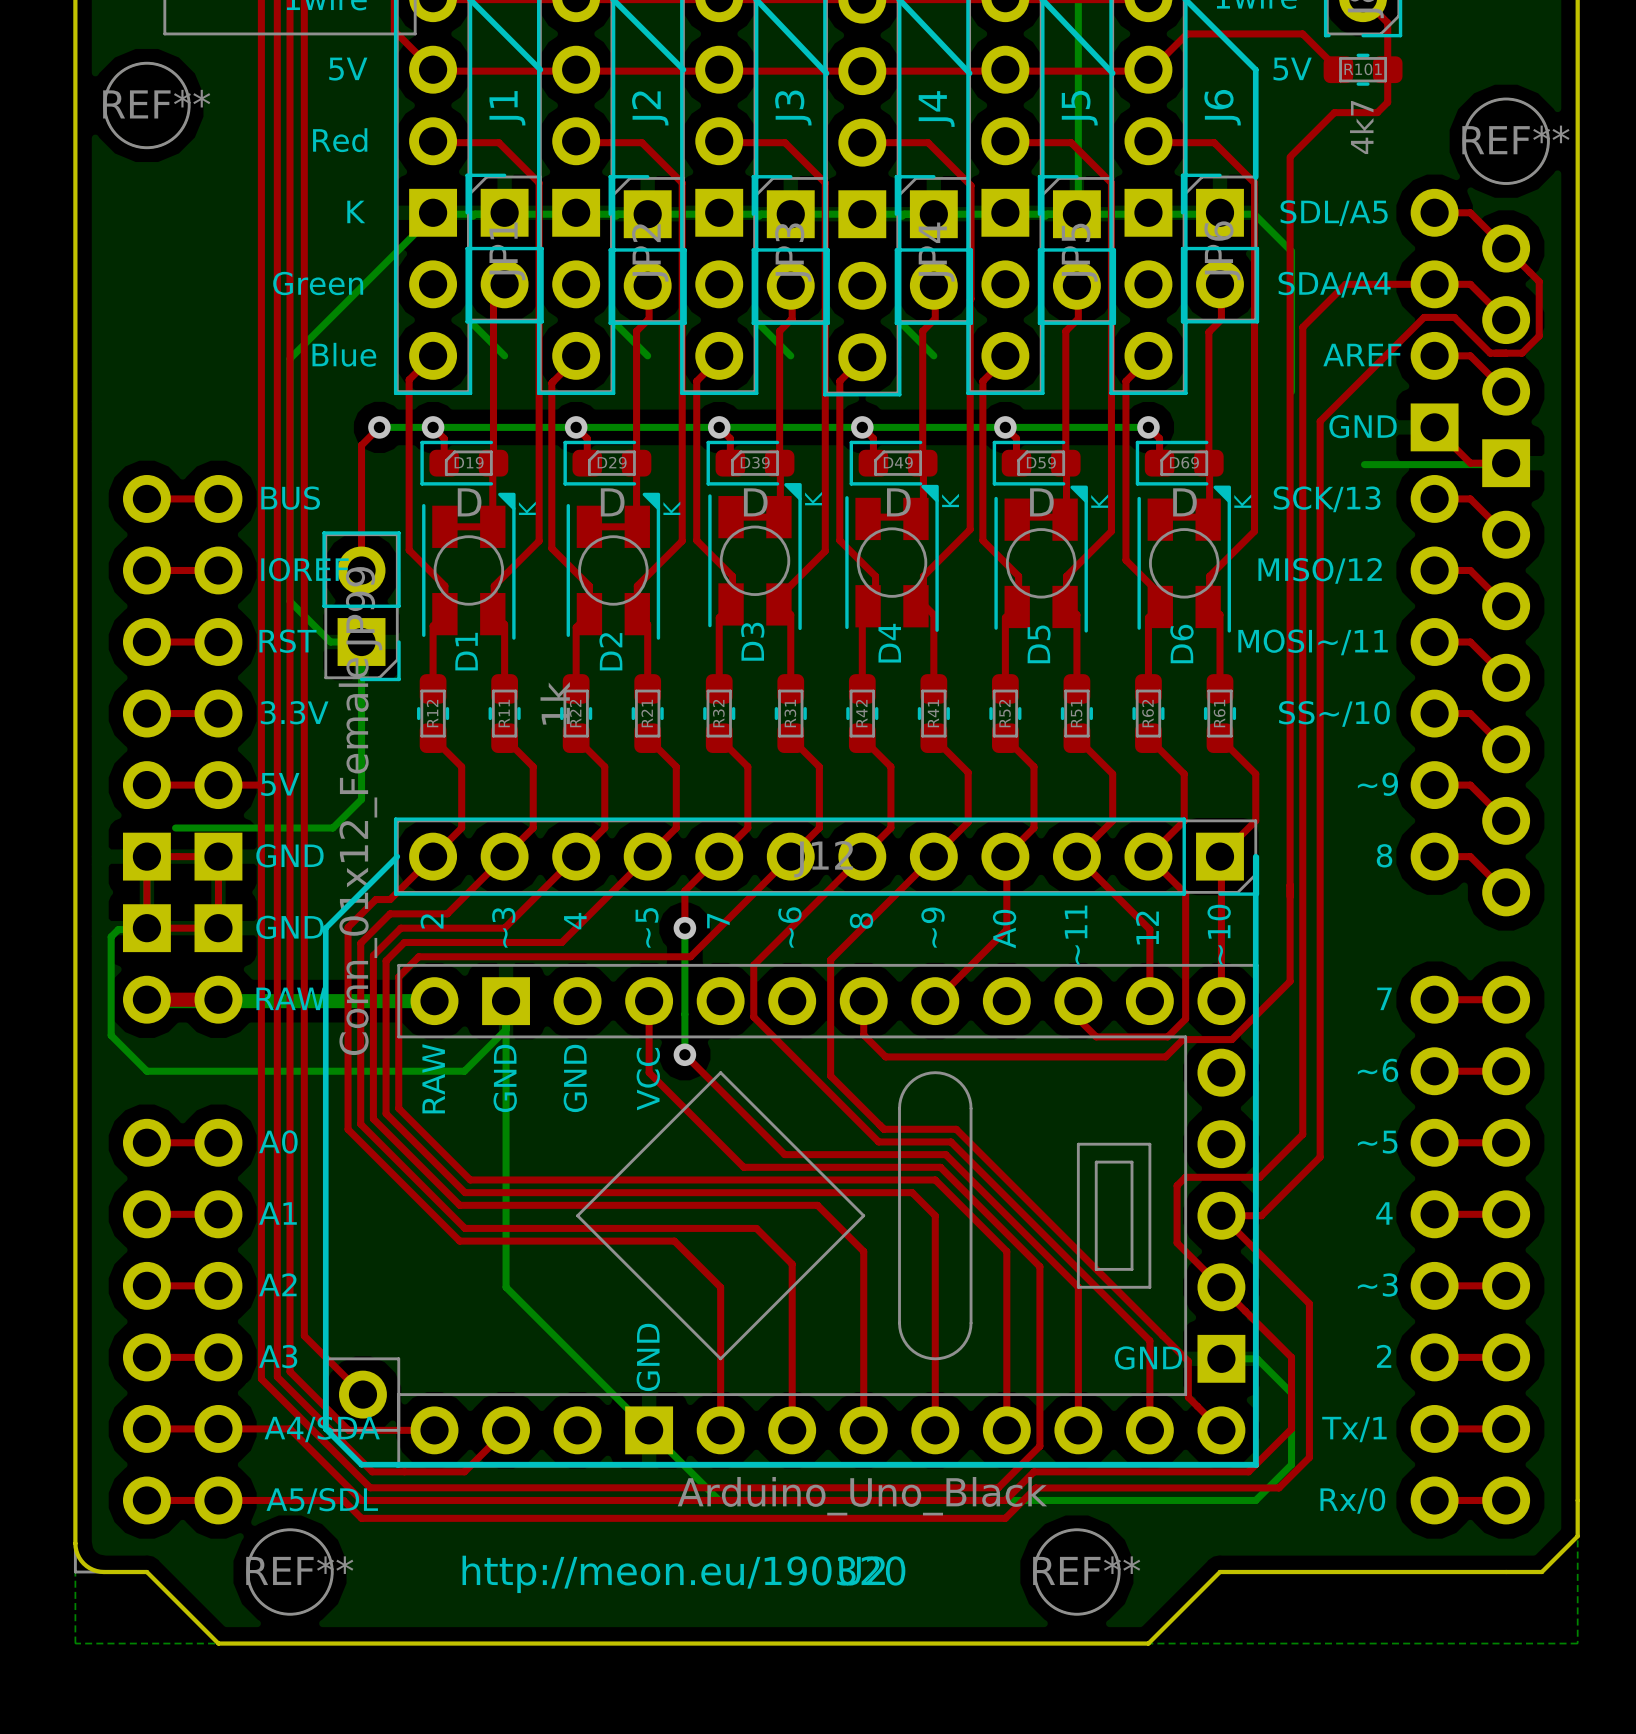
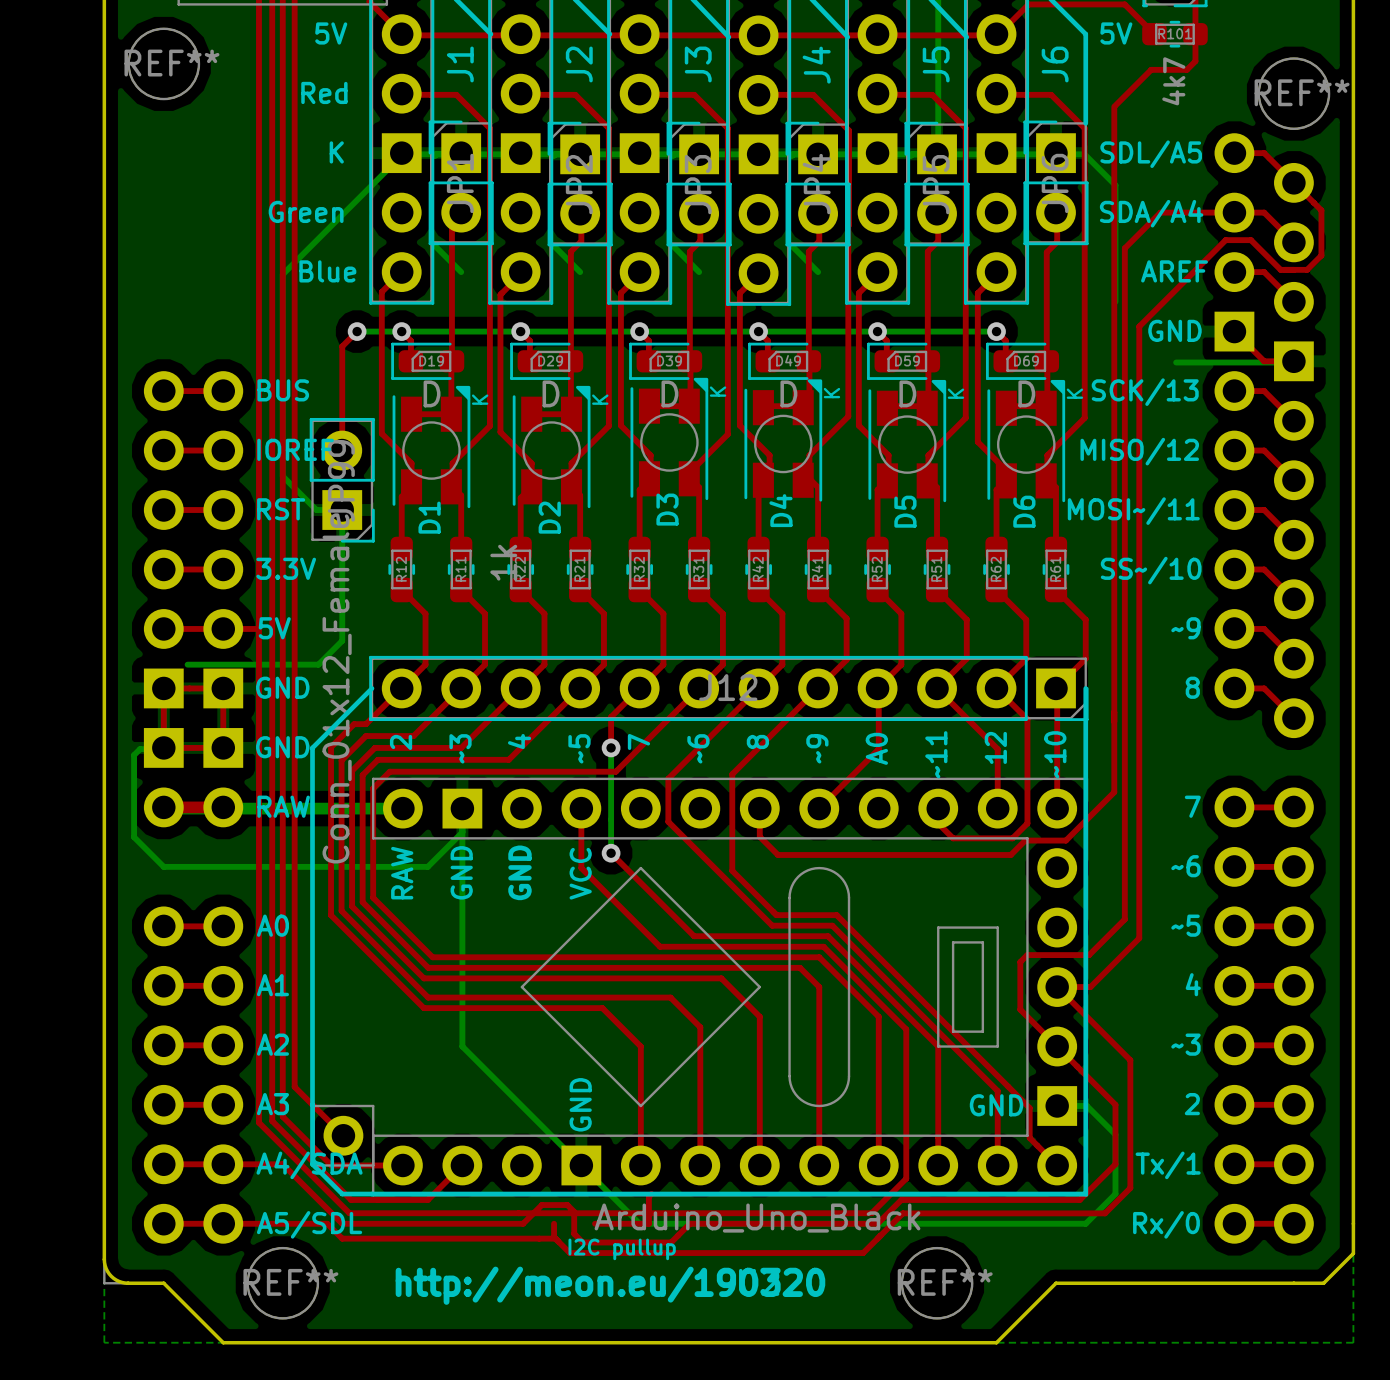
top track: (579, 1500) (665, 1500) -> (523, 1223) (541, 1205) (567, 1205) (574, 1211) (574, 1233) (582, 1242) (671, 1242) (689, 1223)
top track: (730, 1500) (779, 1500) -> (648, 1223) (648, 1196) (651, 1194)
top track: (617, 1518) (1005, 1518) -> (554, 1223) (554, 1237) (569, 1253) (863, 1253) (877, 1238)
text: none -> I2C pullup (622, 1249)

